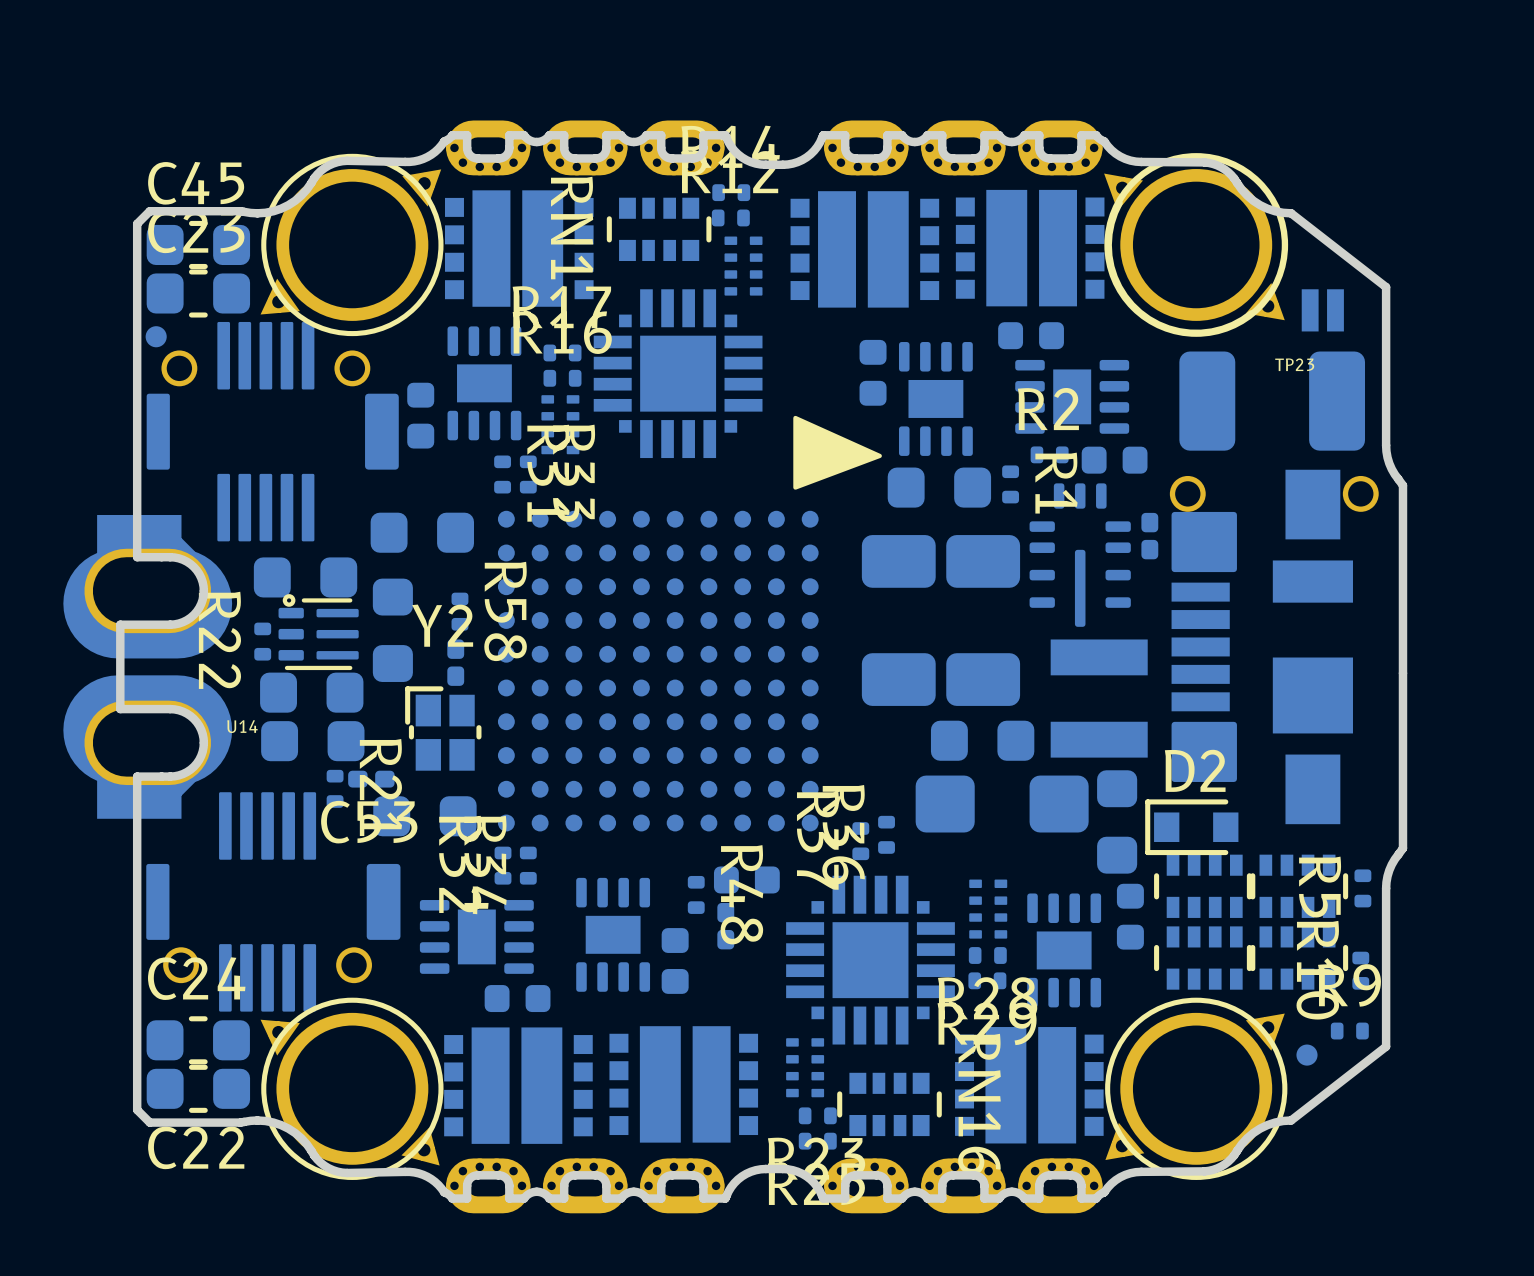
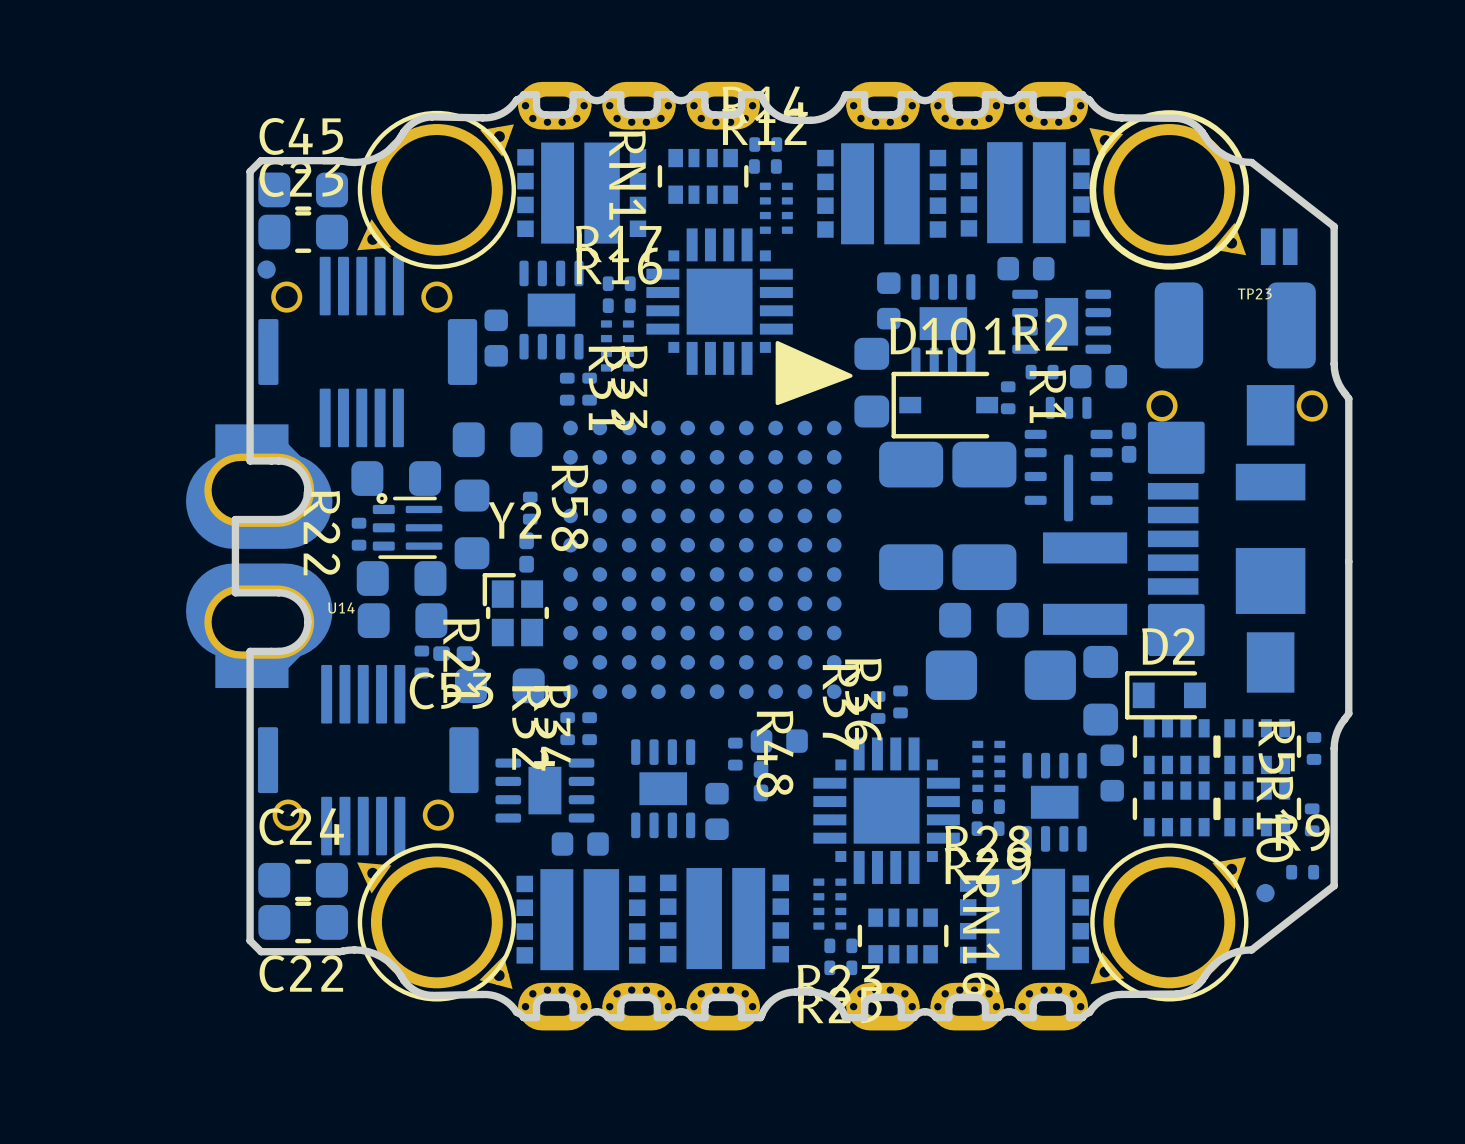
drawing position: (837, 452) -> (814, 373)
part rotation: 0° (939, 487) -> 90° clockwise (871, 382)
part position: (939, 487) -> (871, 382)
D101: none -> (944, 405)

